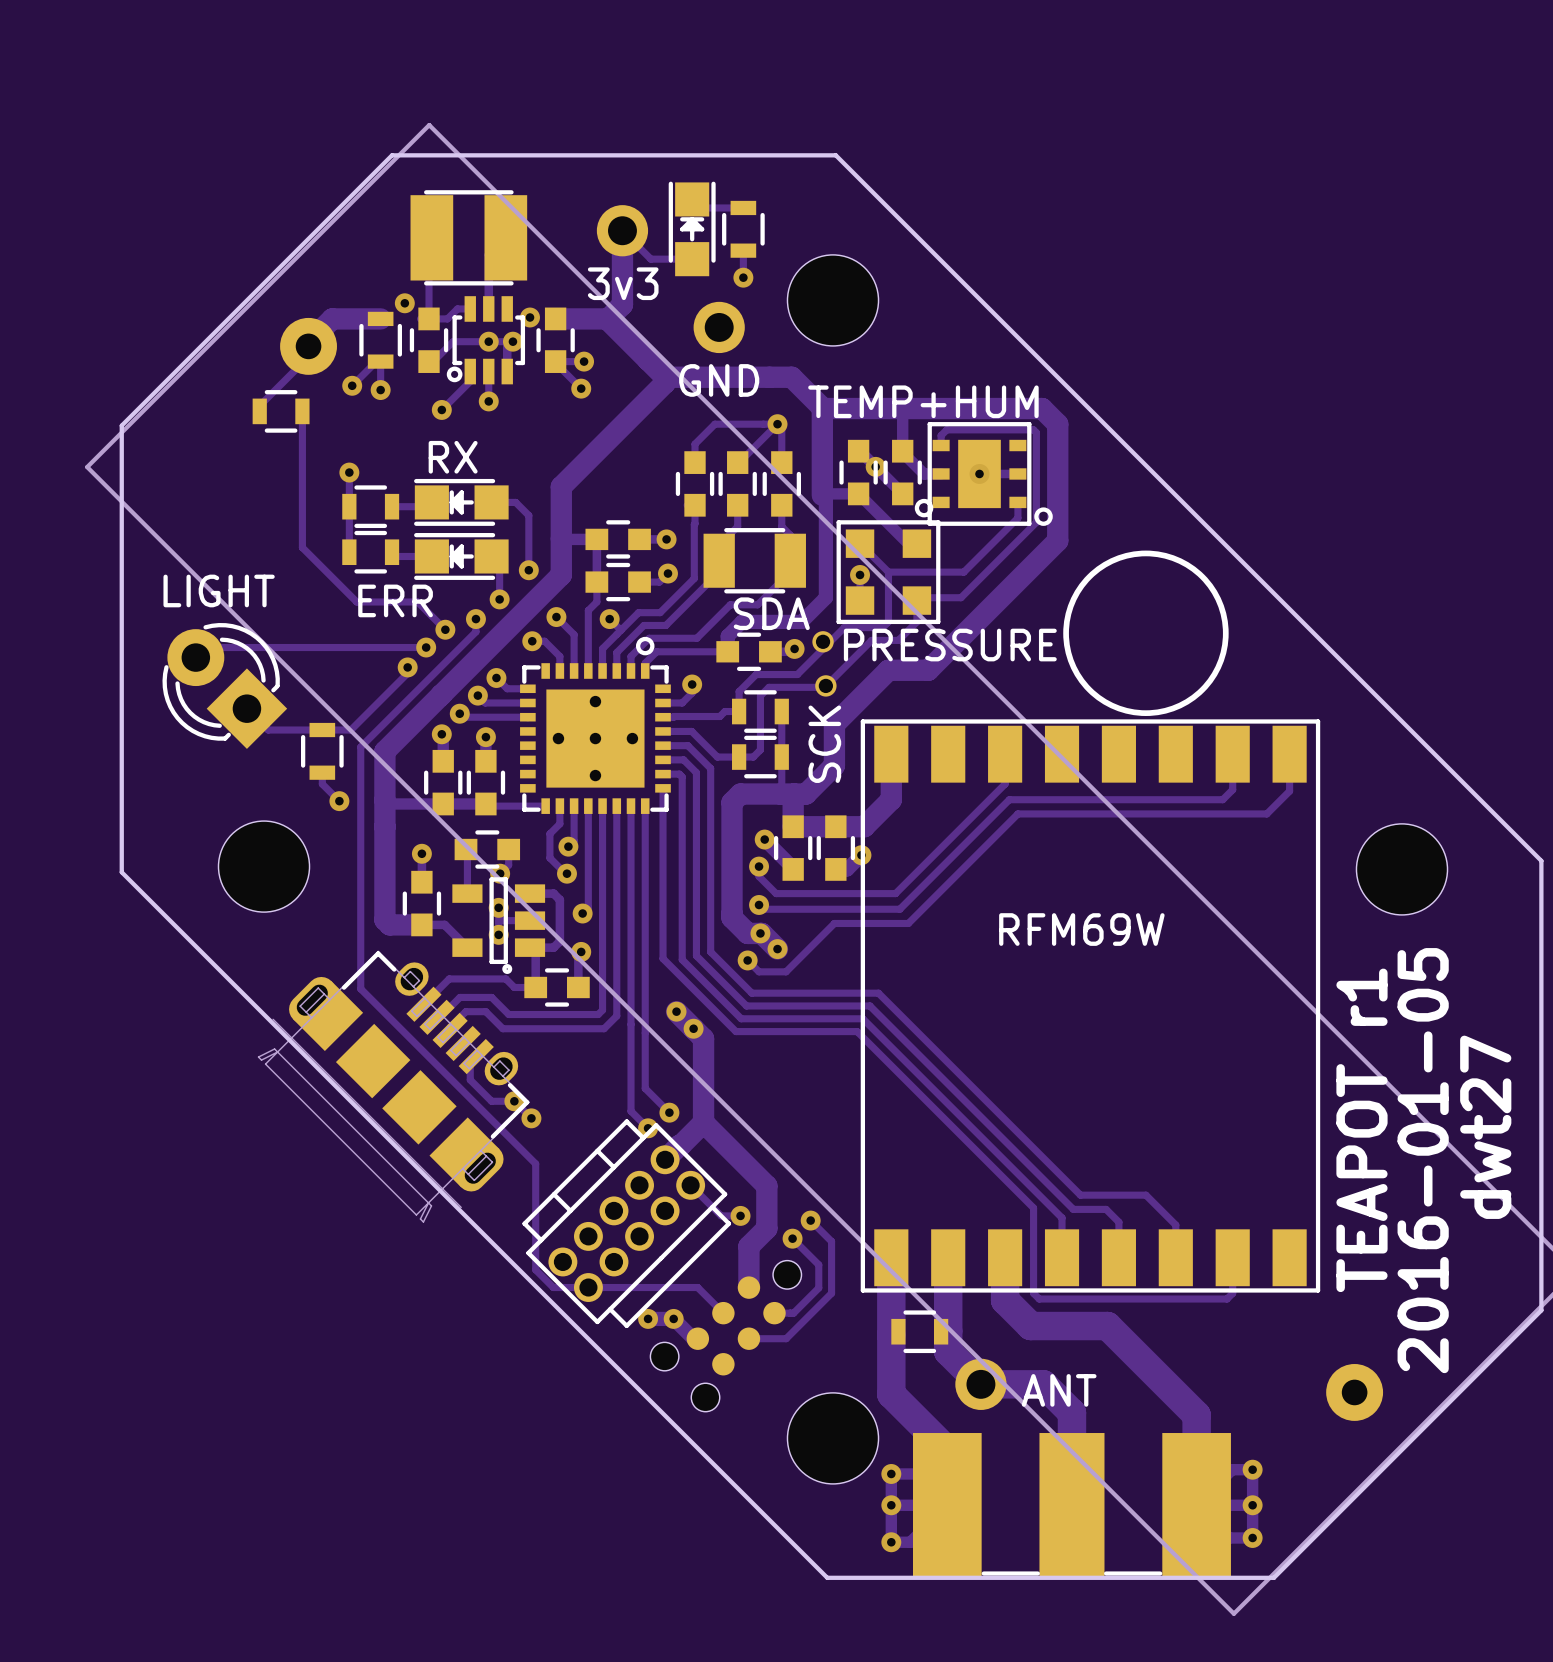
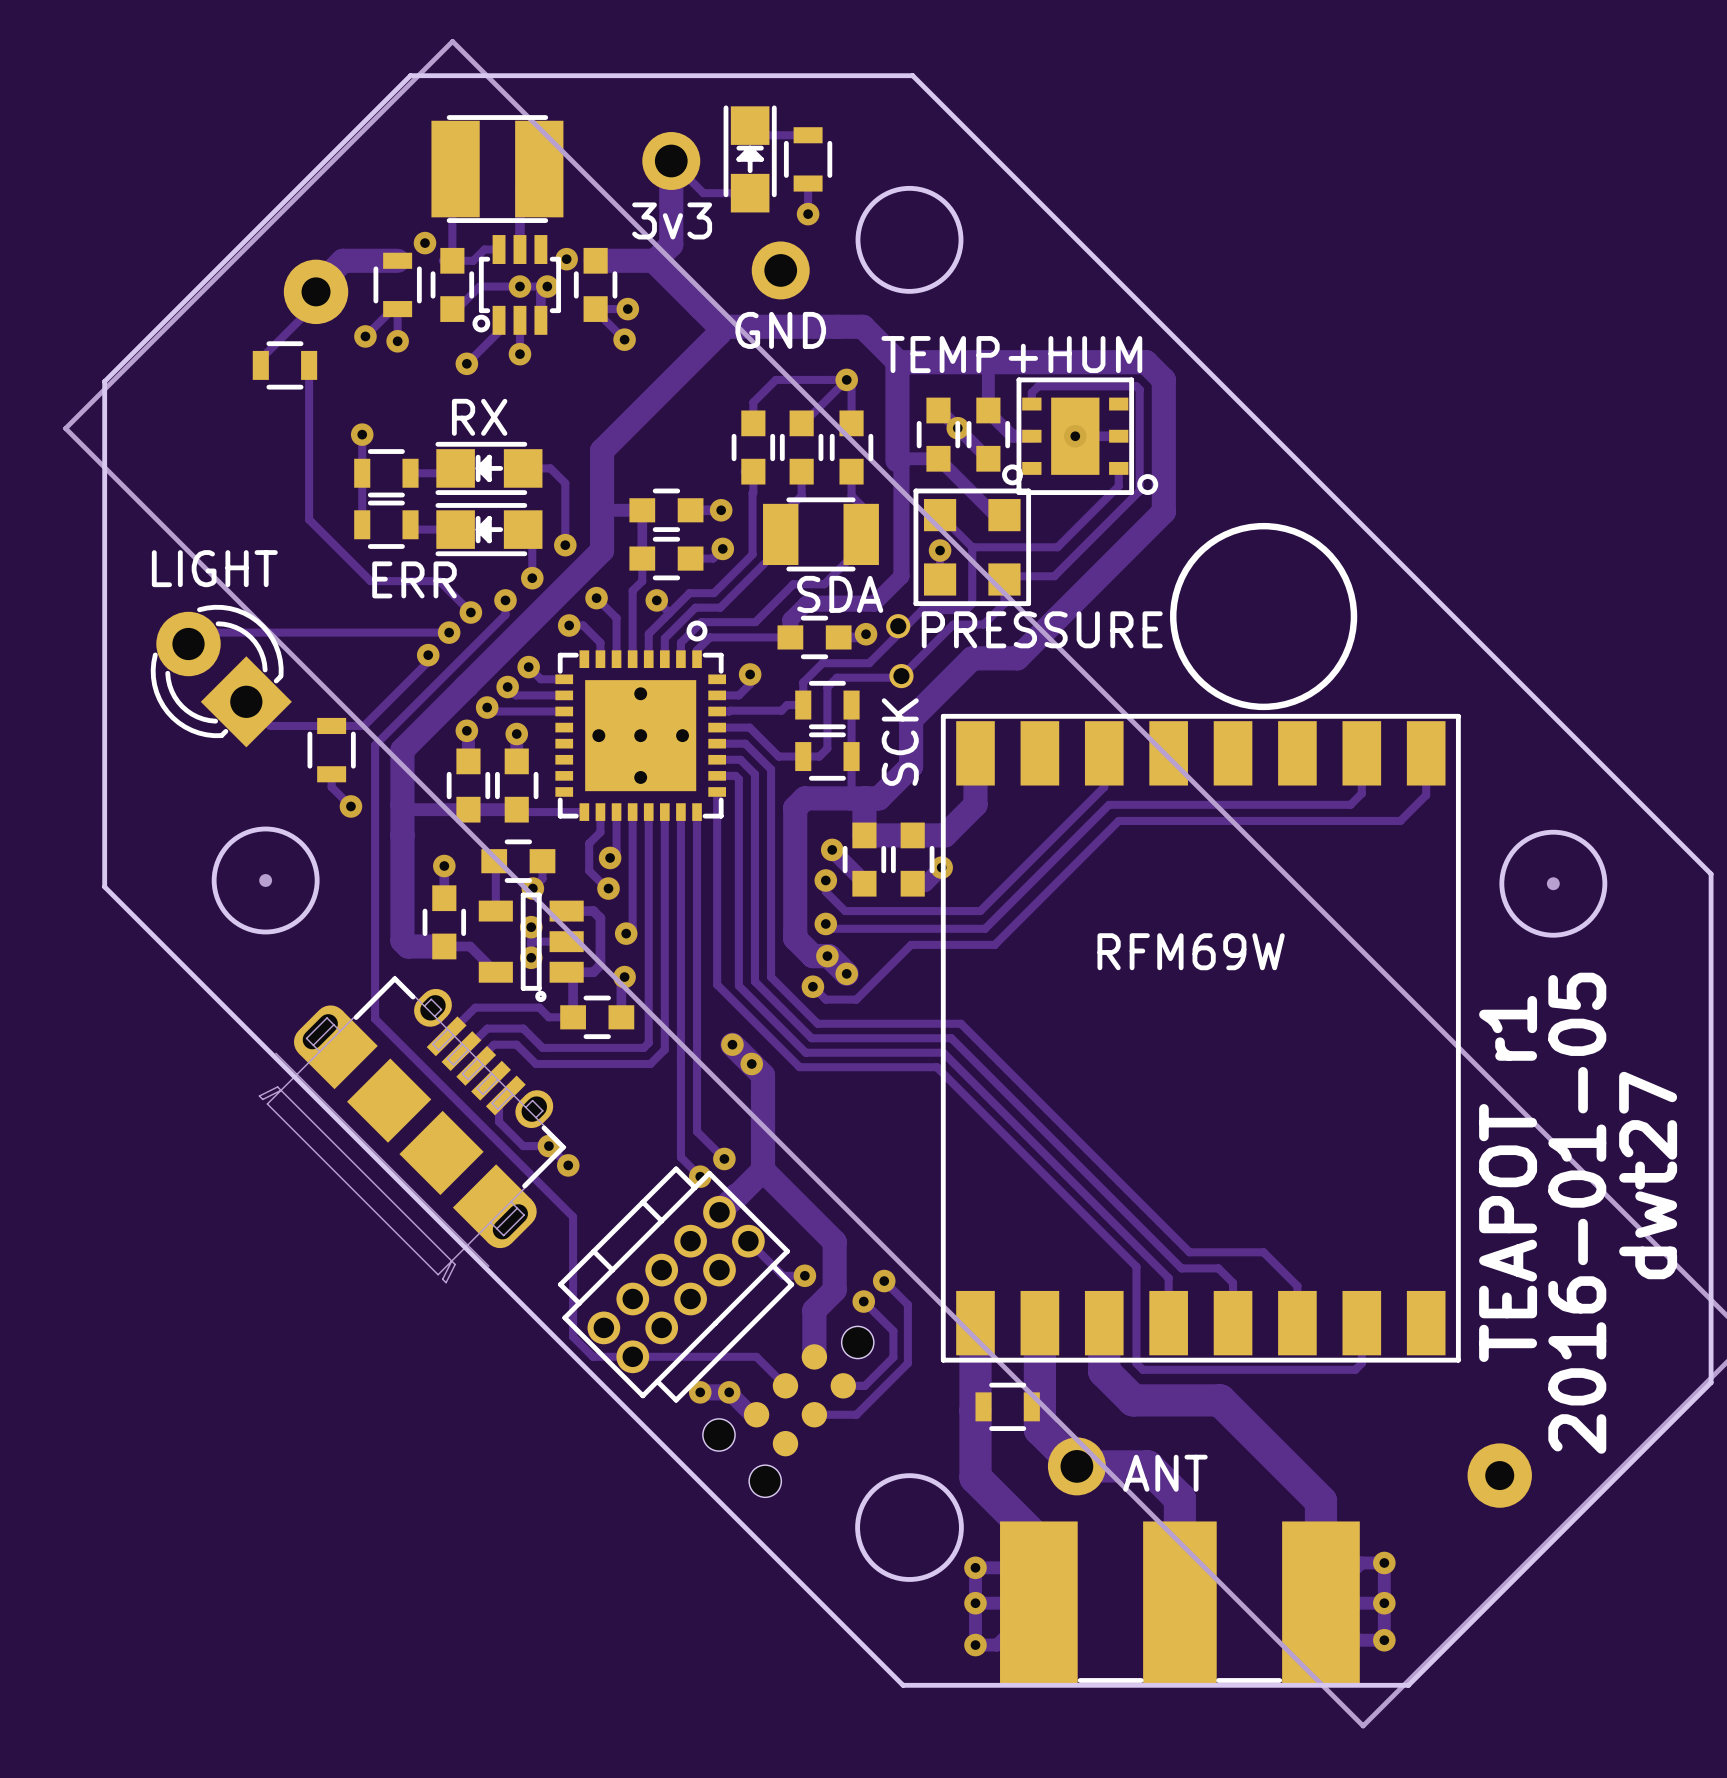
round board edge: none -> [855, 185, 964, 294]
part: (833, 300) -> none
round board edge: none -> [211, 826, 320, 935]
round board edge: none -> [1499, 829, 1608, 938]
drawing: none -> [259, 874, 273, 887]
drawing: none -> [1546, 877, 1560, 891]
part: (264, 866) -> none
part: (1401, 869) -> none
round board edge: none -> [855, 1473, 964, 1582]
part: (833, 1438) -> none

